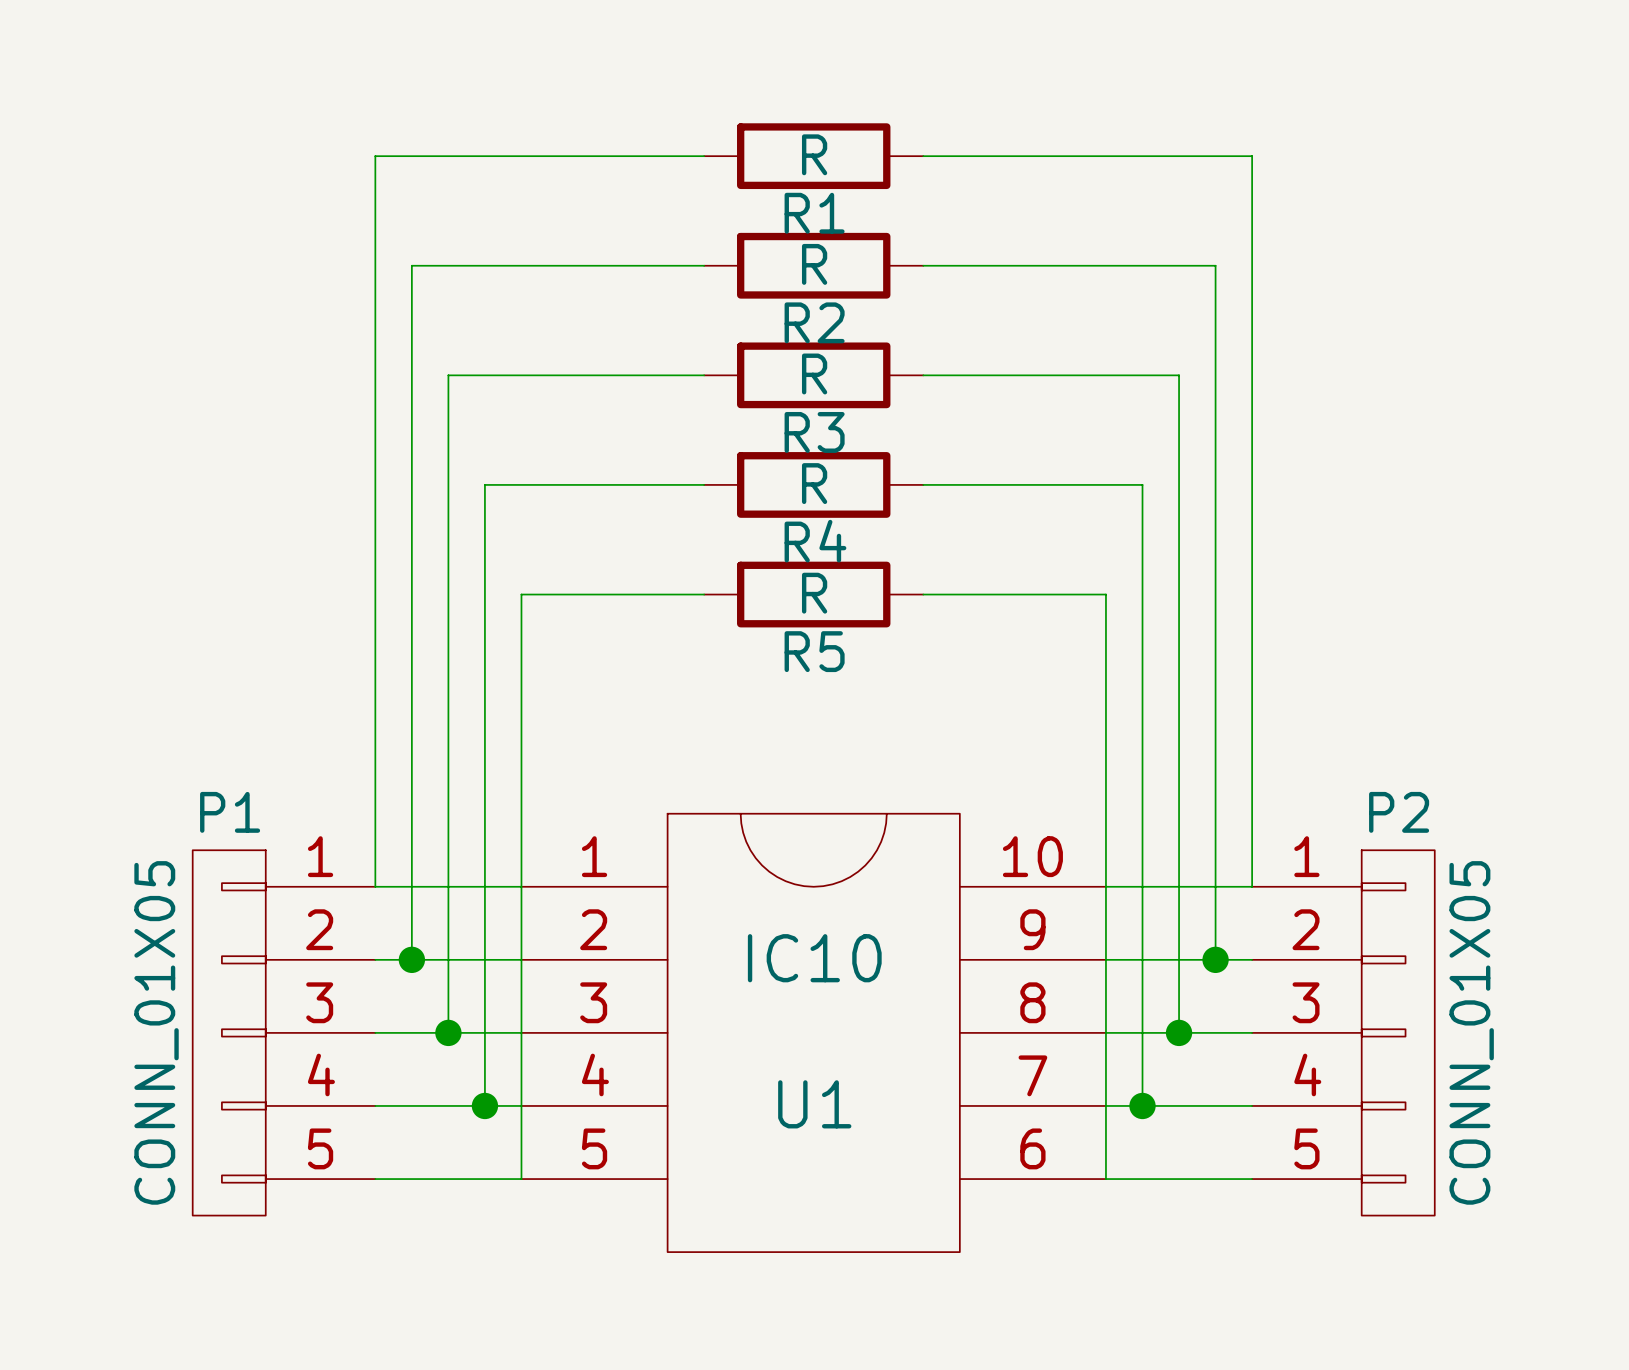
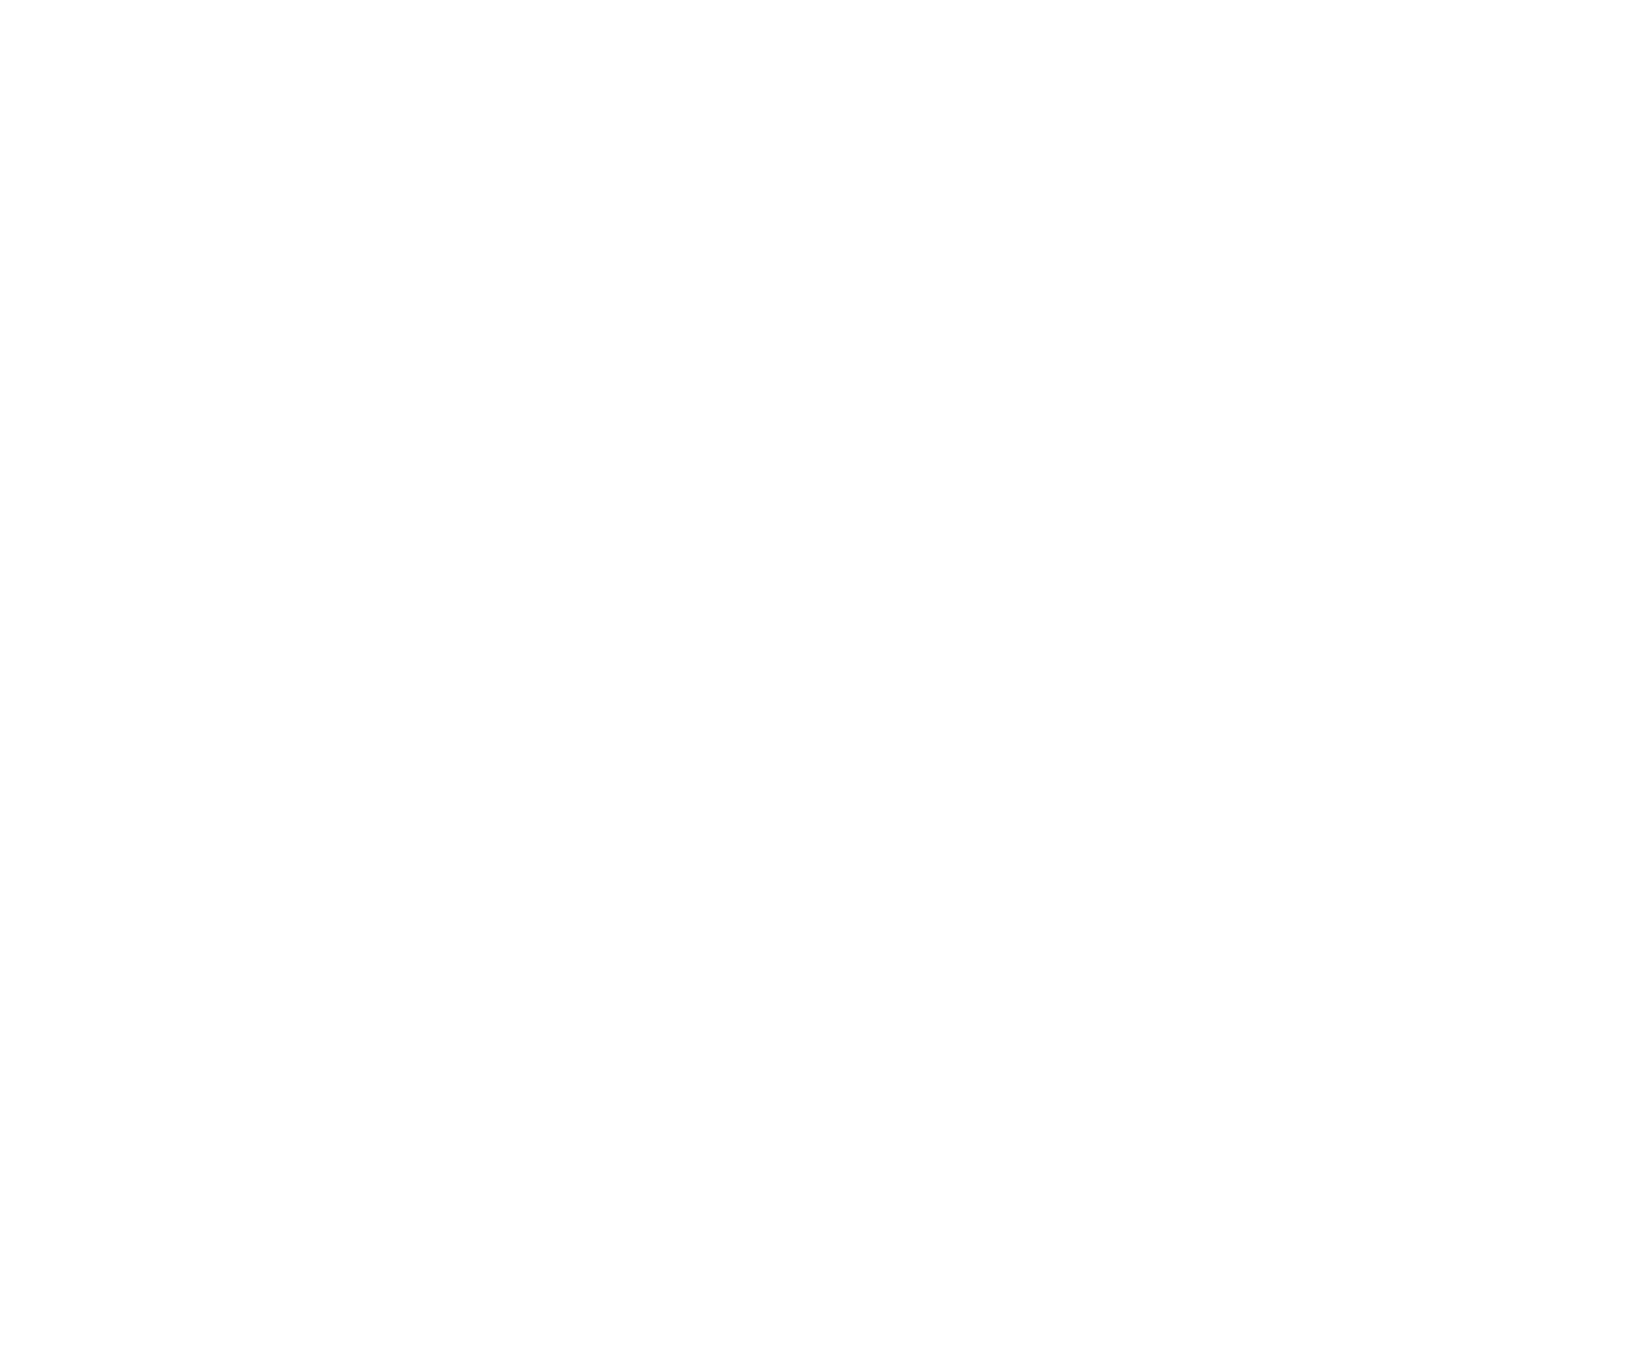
wire: (704, 156) (375, 156) (375, 886) (521, 886) -> none
R1: R (813, 156) -> none
wire: (923, 156) (1252, 156) (1252, 886) (1105, 886) -> none
wire: (704, 265) (411, 265) (411, 959) -> none
R2: R (813, 265) -> none
wire: (923, 265) (1215, 265) (1215, 959) -> none
wire: (704, 375) (448, 375) (448, 1032) -> none
R3: R (813, 375) -> none
wire: (923, 375) (1179, 375) (1179, 1032) -> none
wire: (704, 484) (484, 484) (484, 1105) -> none
R4: R (813, 484) -> none
wire: (923, 484) (1142, 484) (1142, 1105) -> none
wire: (704, 594) (521, 594) (521, 1179) (375, 1179) -> none
R5: R (813, 594) -> none
wire: (923, 594) (1105, 594) (1105, 1179) (1252, 1179) -> none
wire: (375, 959) (521, 959) -> none
junction: (411, 959) -> none
wire: (1105, 959) (1252, 959) -> none
junction: (1215, 959) -> none
P1: CONN_01X05 (284, 1032) -> none
wire: (375, 1032) (521, 1032) -> none
junction: (448, 1032) -> none
U1: IC10 (813, 1032) -> none
wire: (1105, 1032) (1252, 1032) -> none
junction: (1179, 1032) -> none
P2: CONN_01X05 (1343, 1032) -> none
wire: (375, 1105) (521, 1105) -> none
junction: (484, 1105) -> none
wire: (1105, 1105) (1252, 1105) -> none
junction: (1142, 1105) -> none

